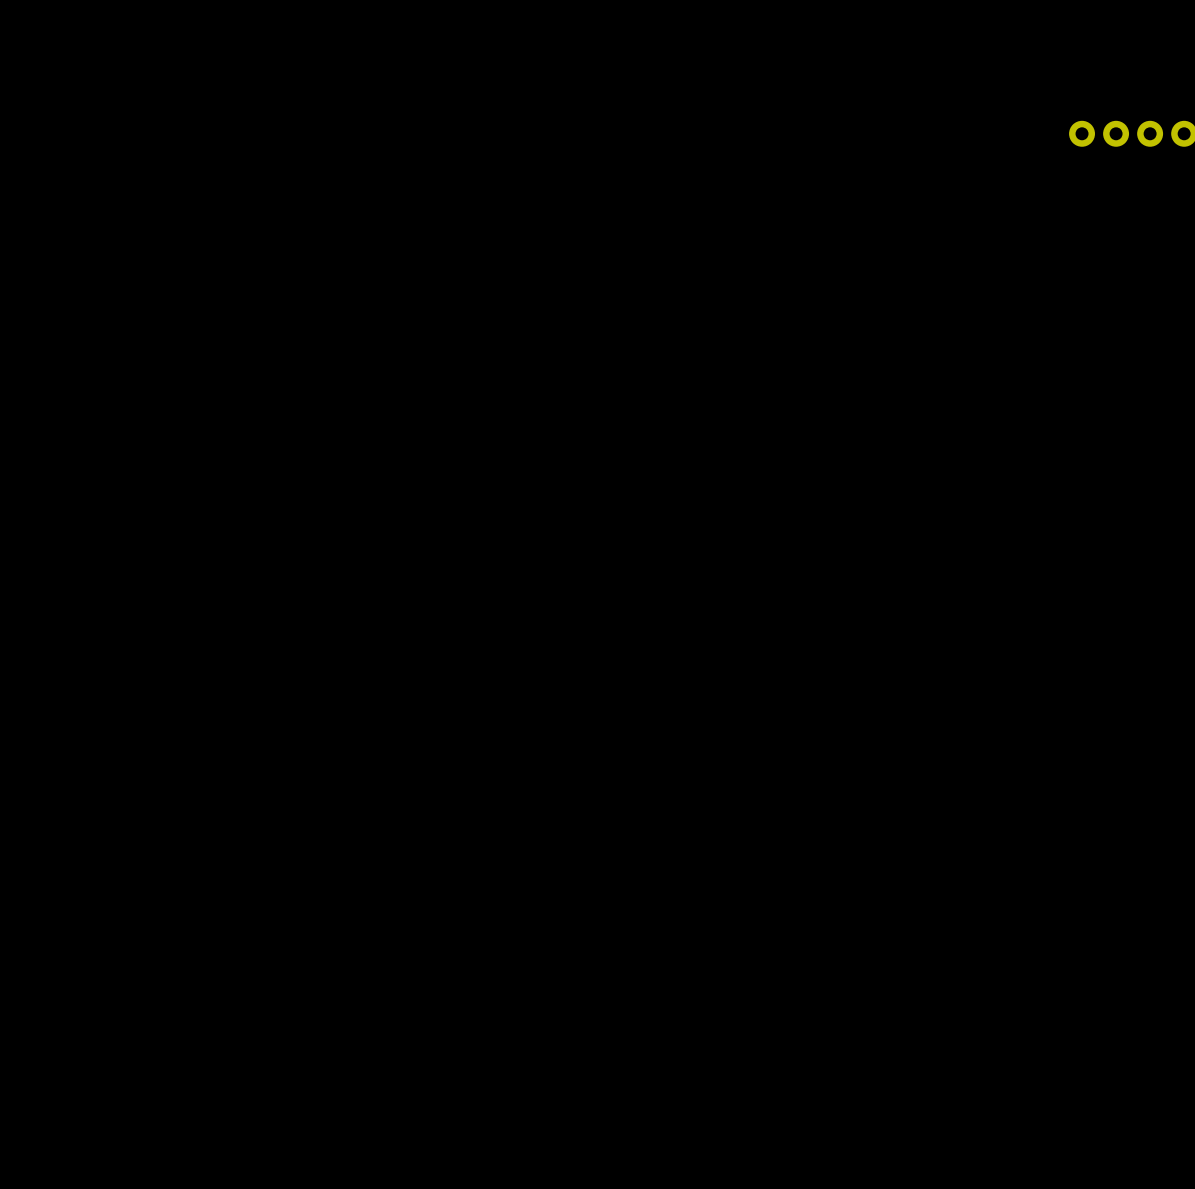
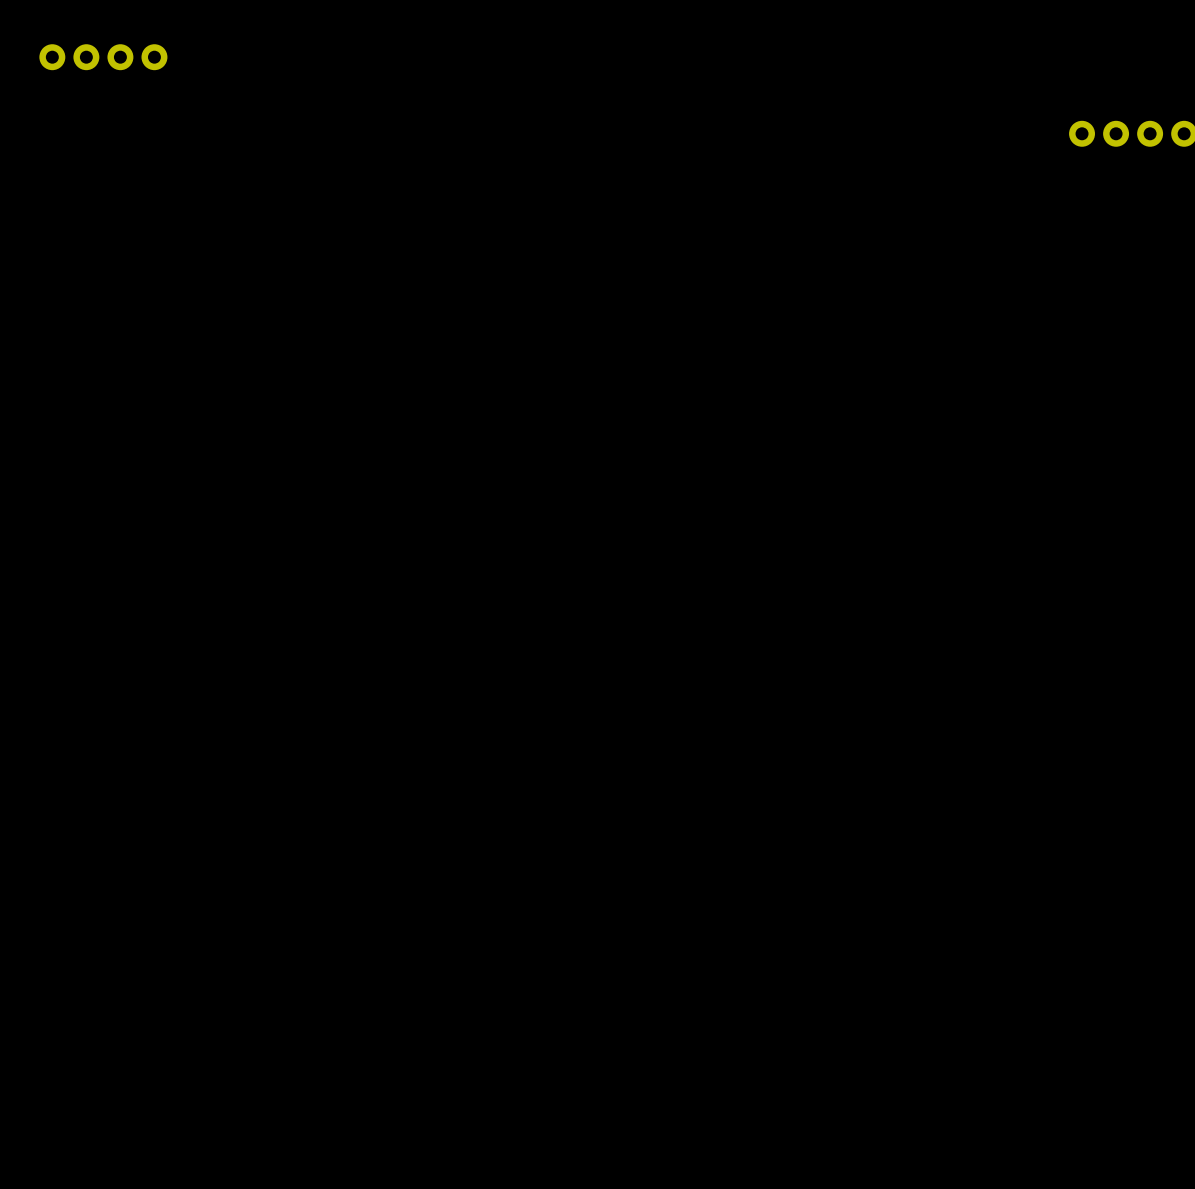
part: none -> (103, 57)

